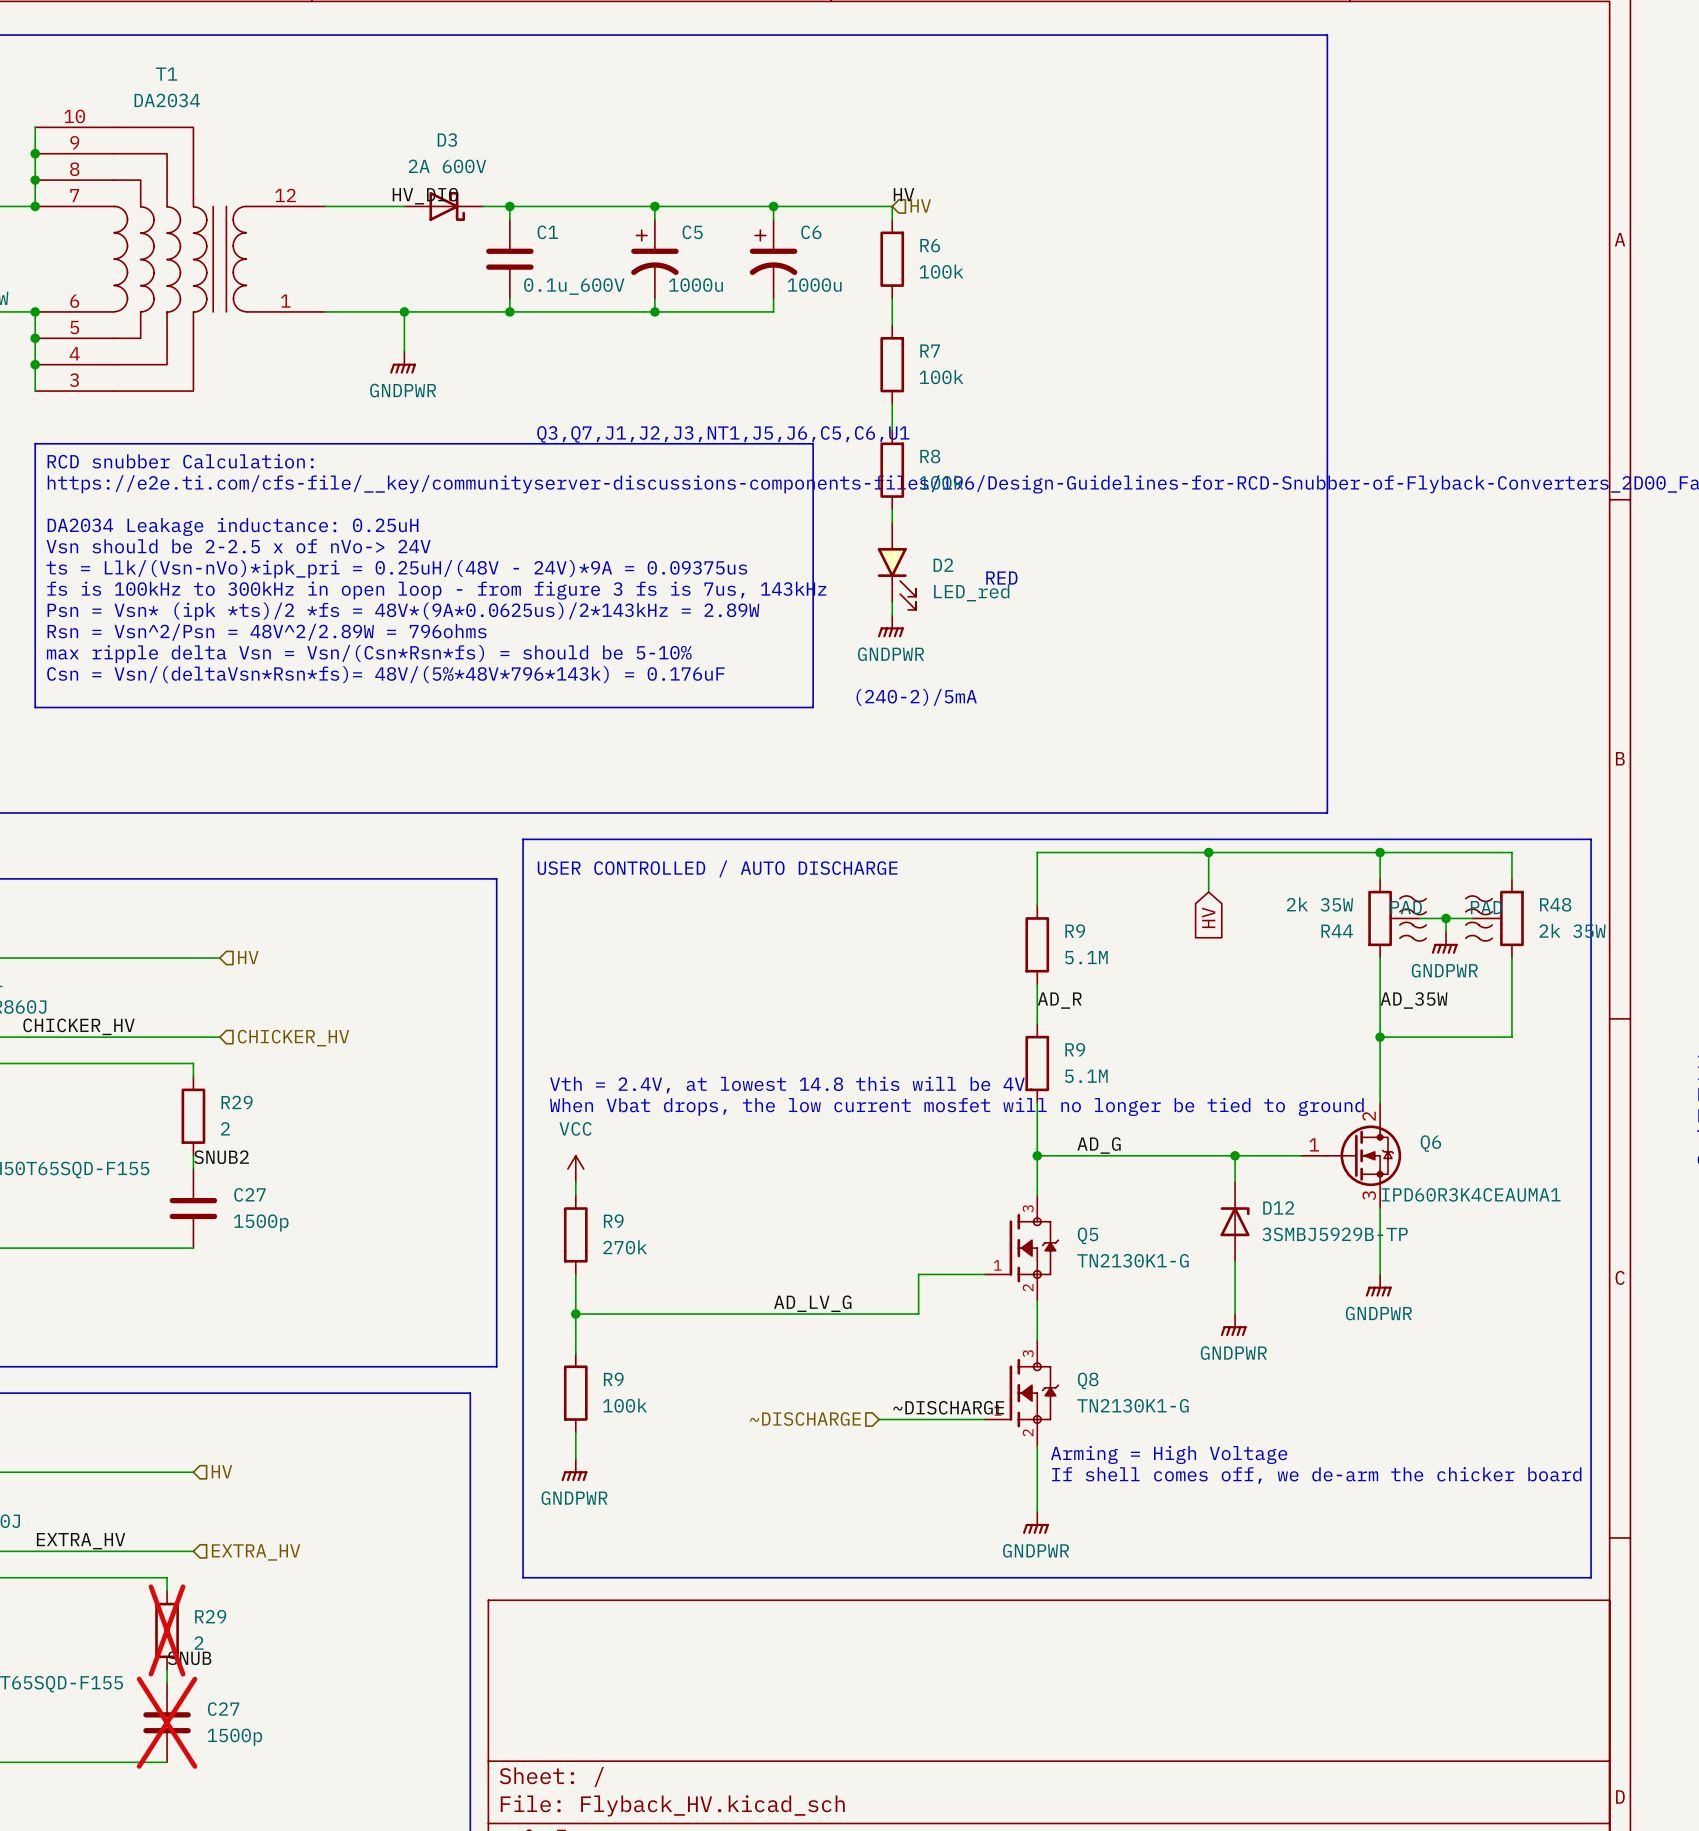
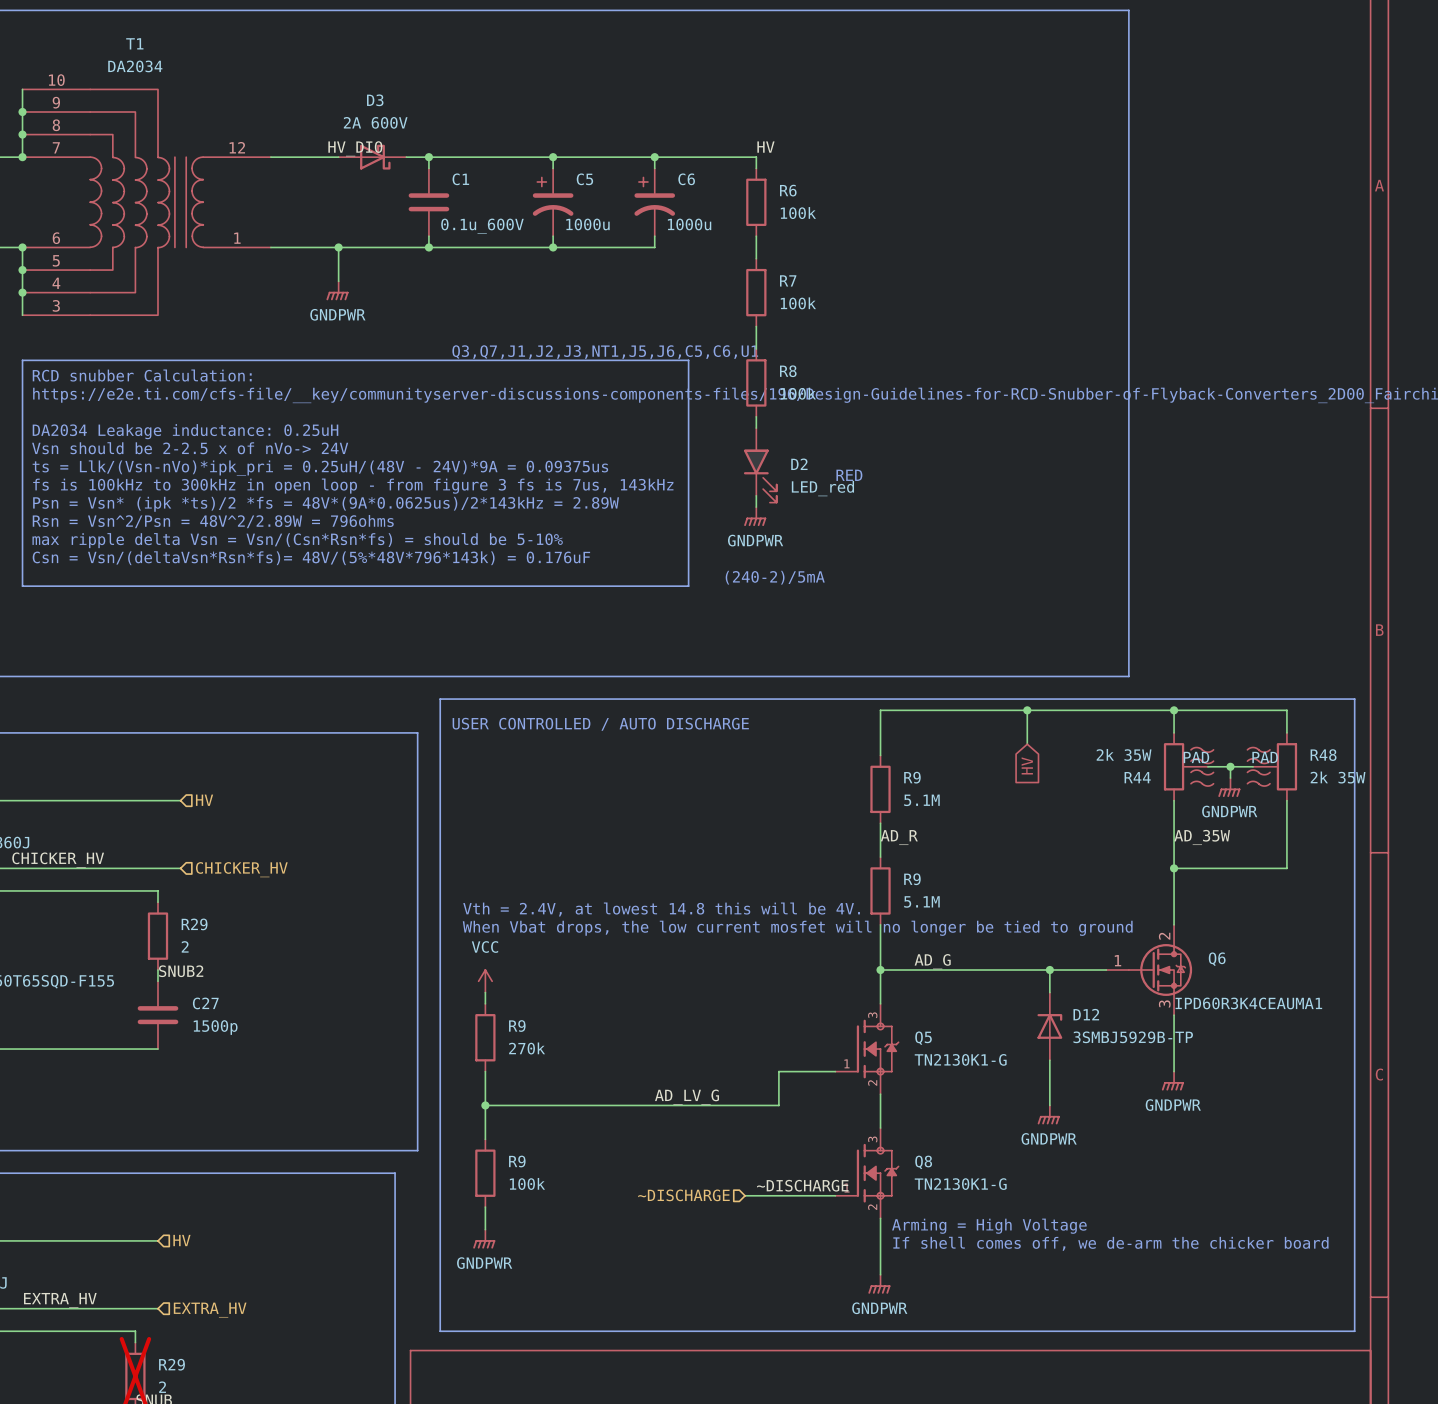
hierarchical label: HV (920, 205) -> none

